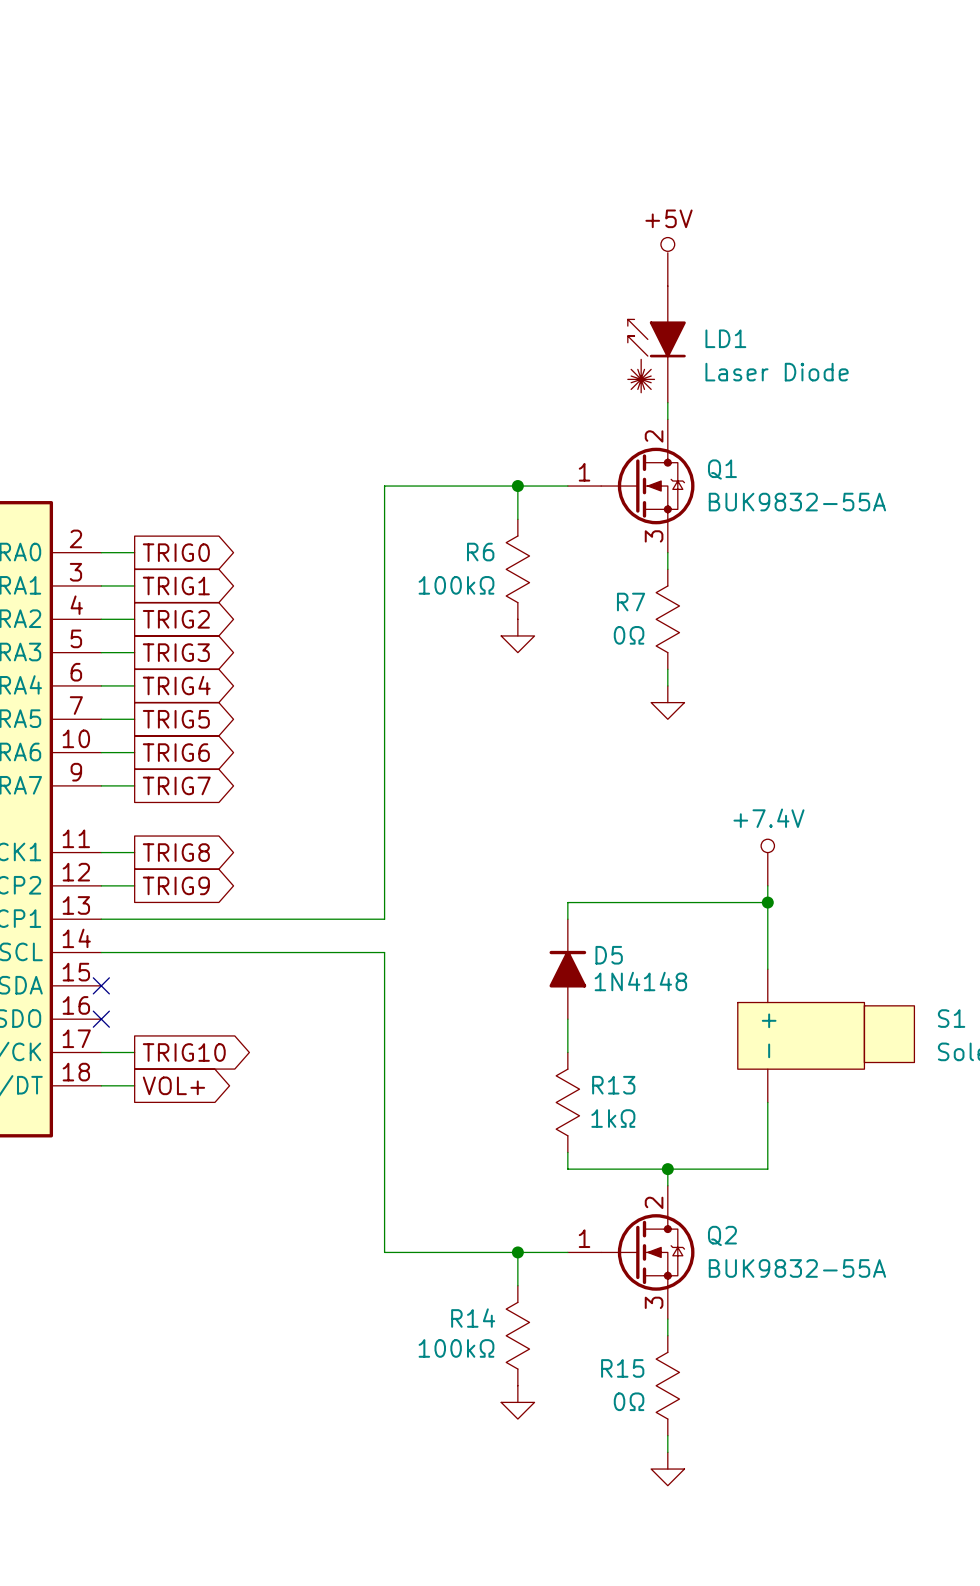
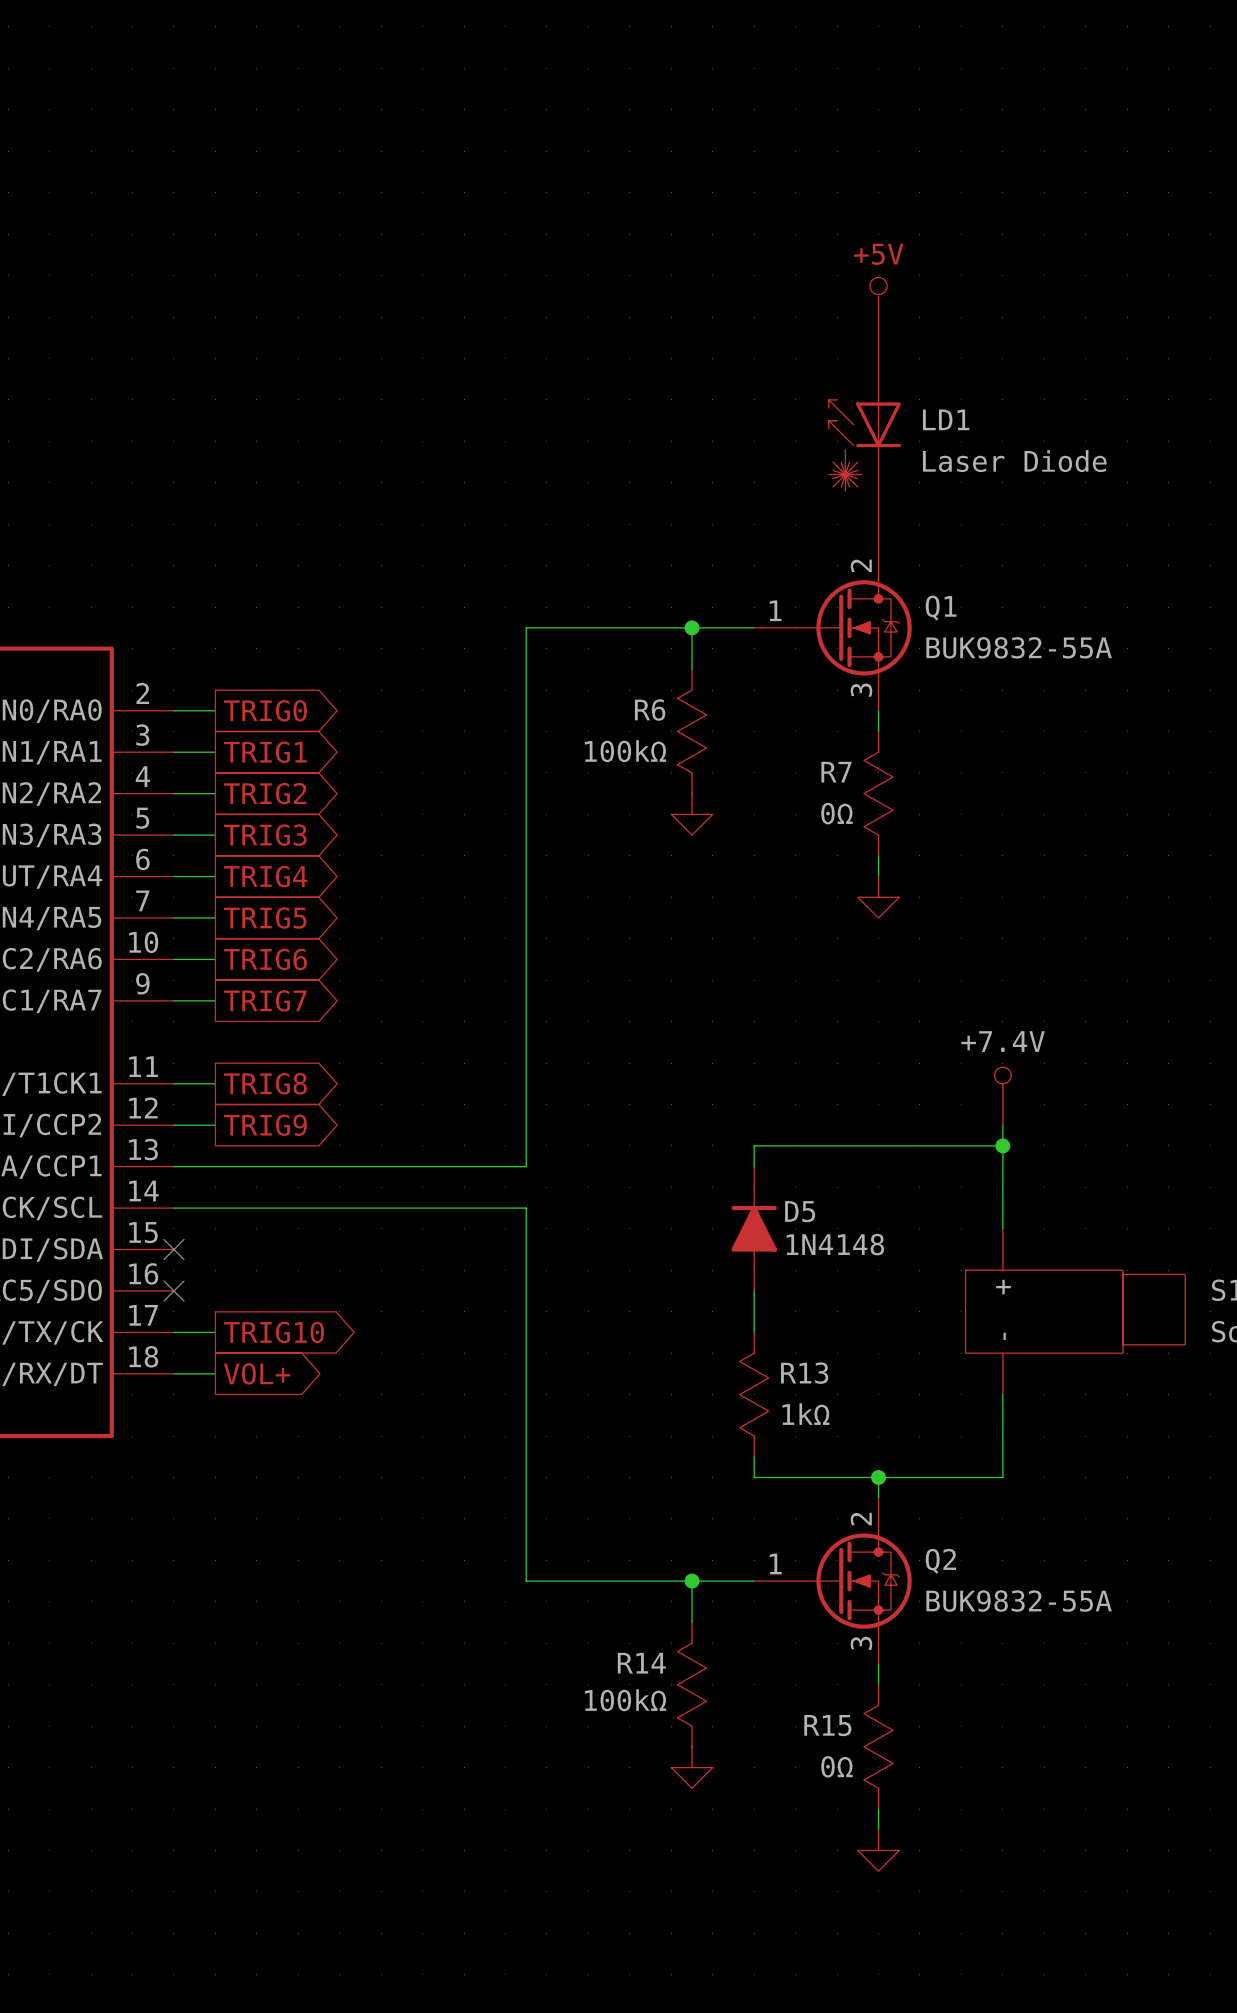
power symbol position: (667, 261) -> (878, 307)
LD1 symbol: [627, 286, 686, 403] -> [828, 337, 901, 545]

